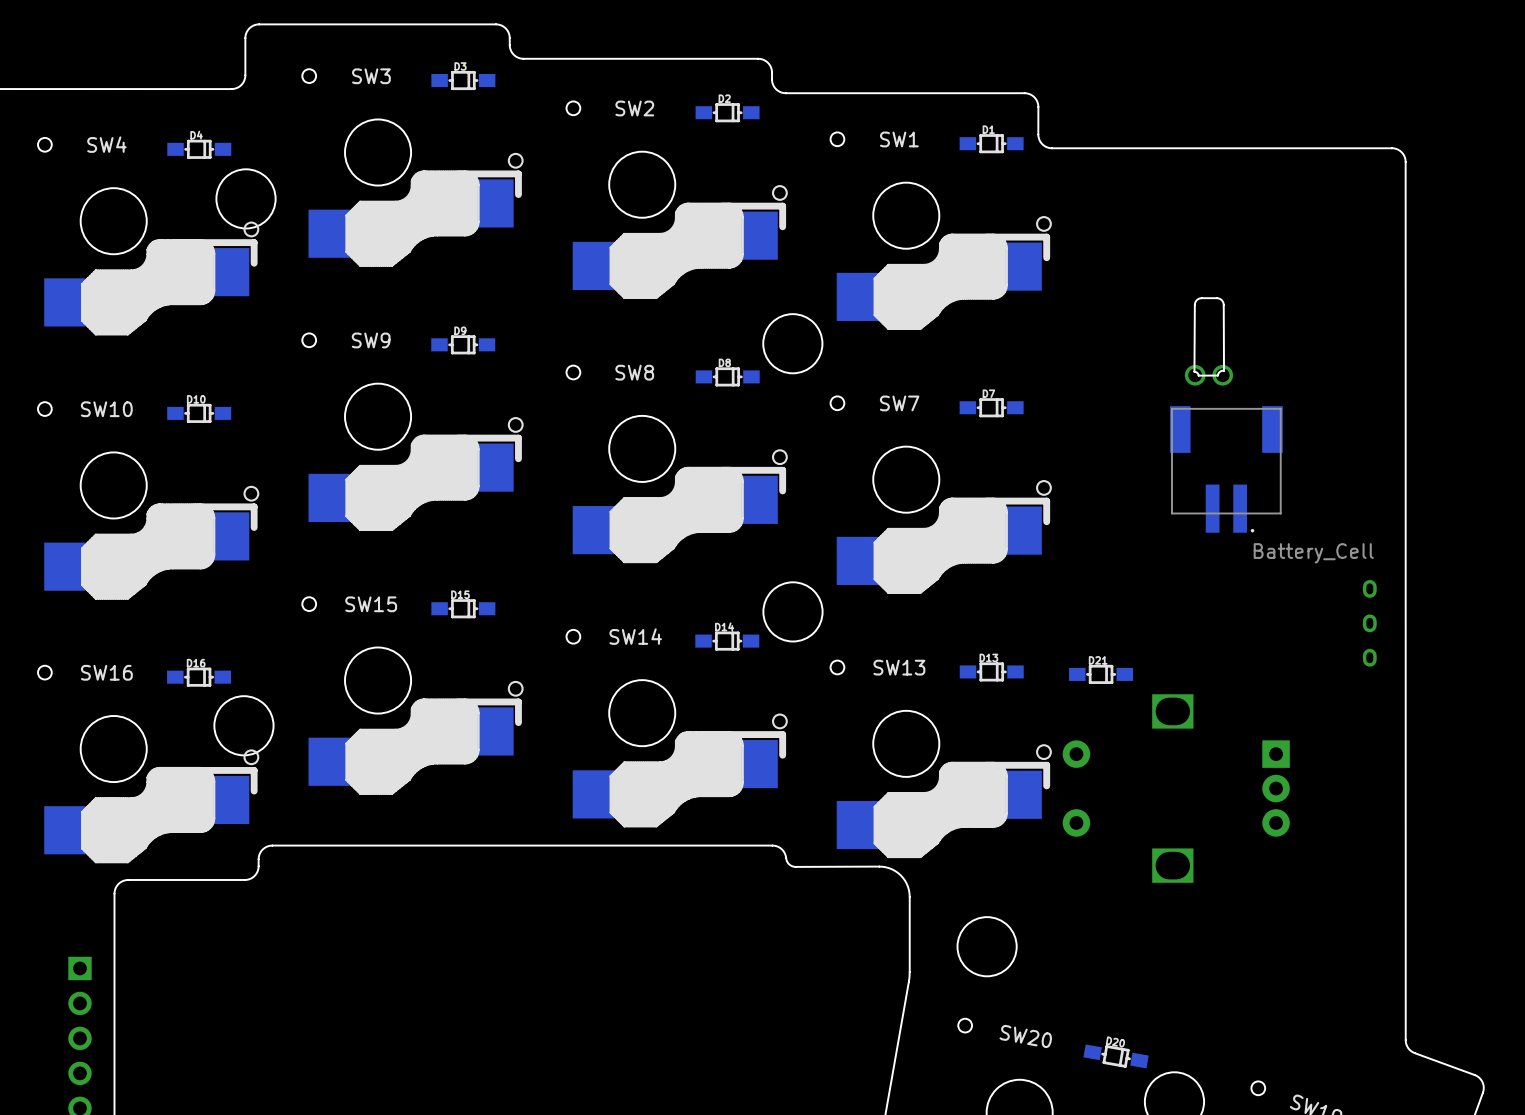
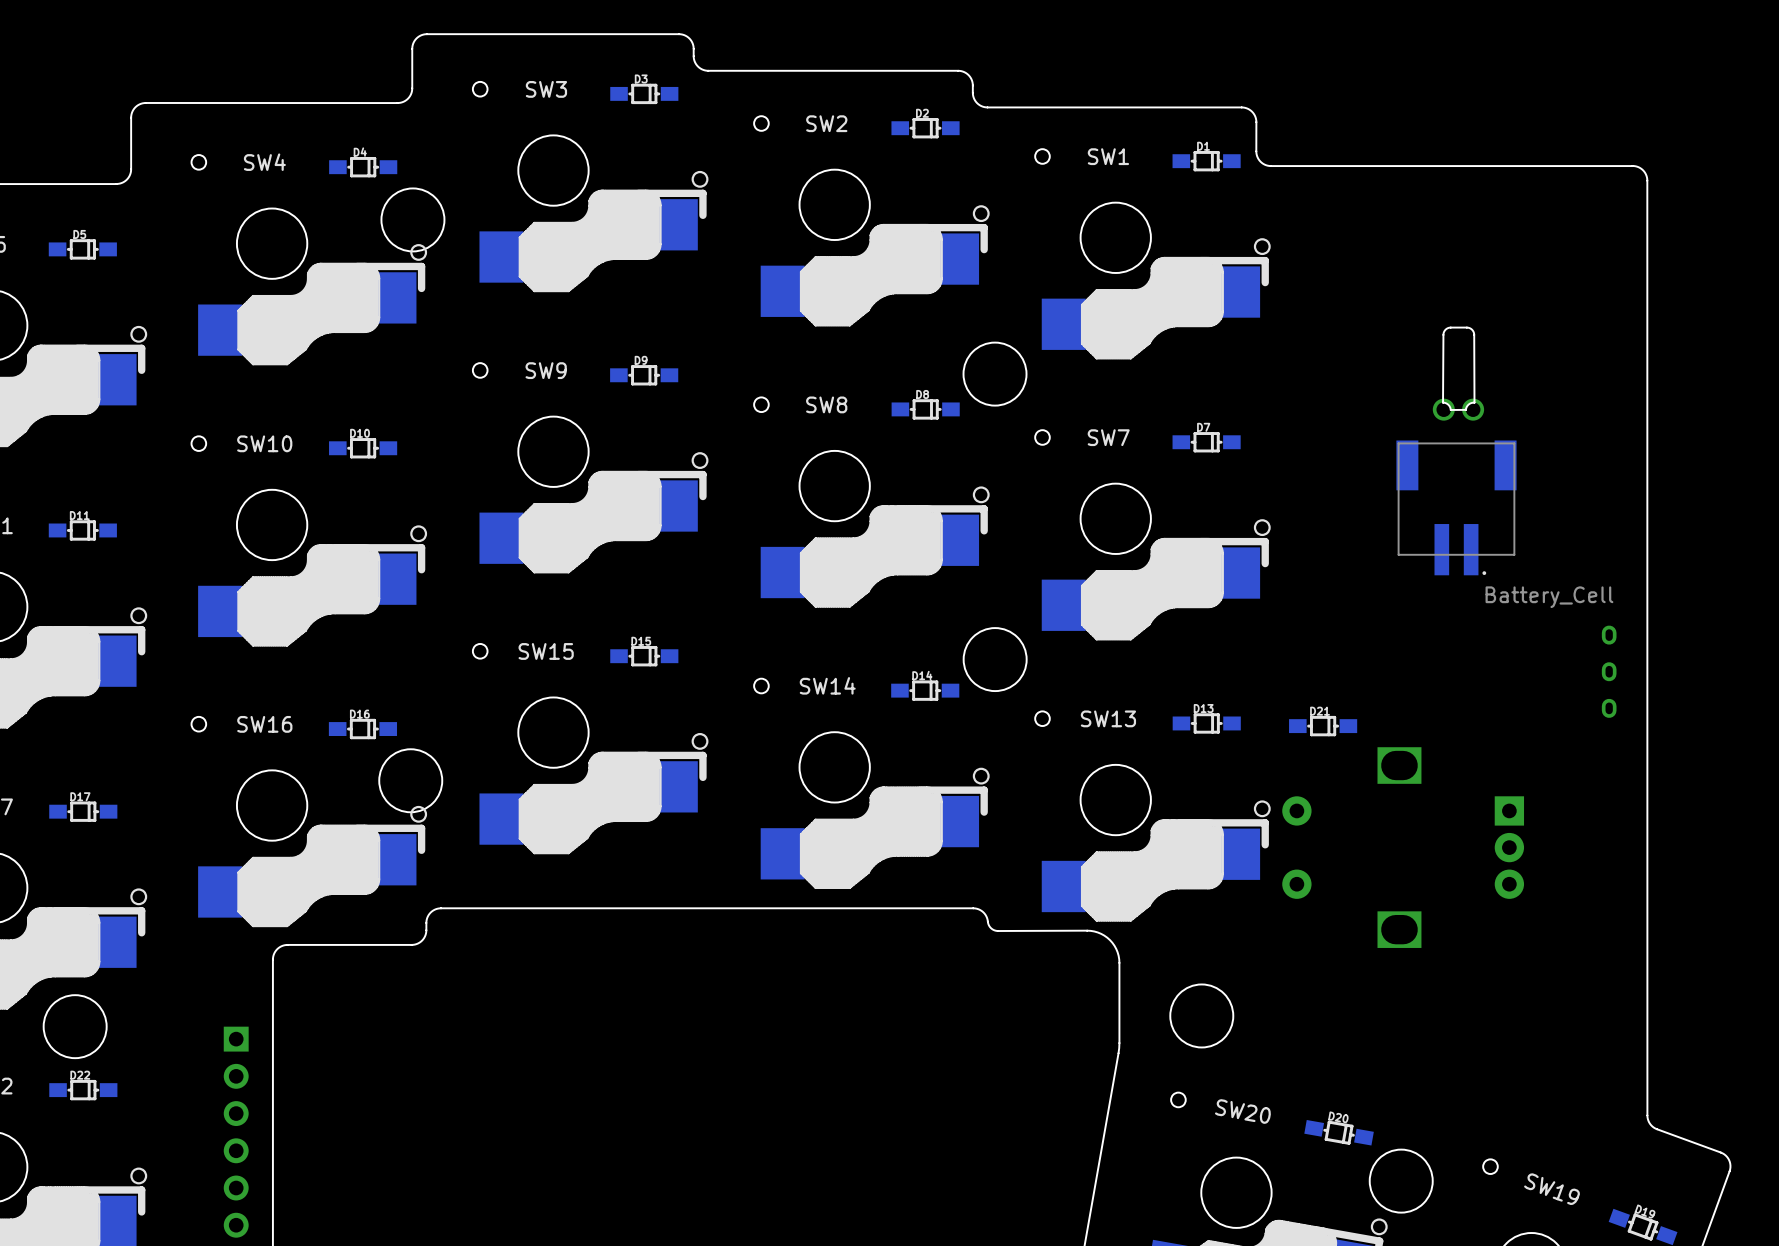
part: (1208, 341) -> none
part: none -> (1458, 373)

